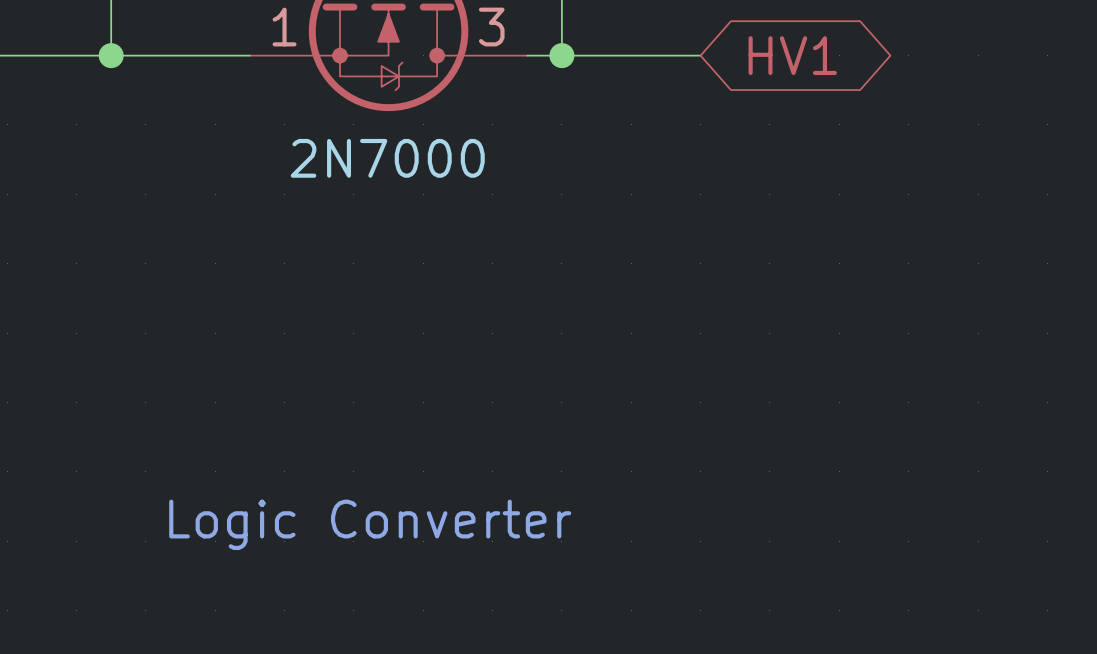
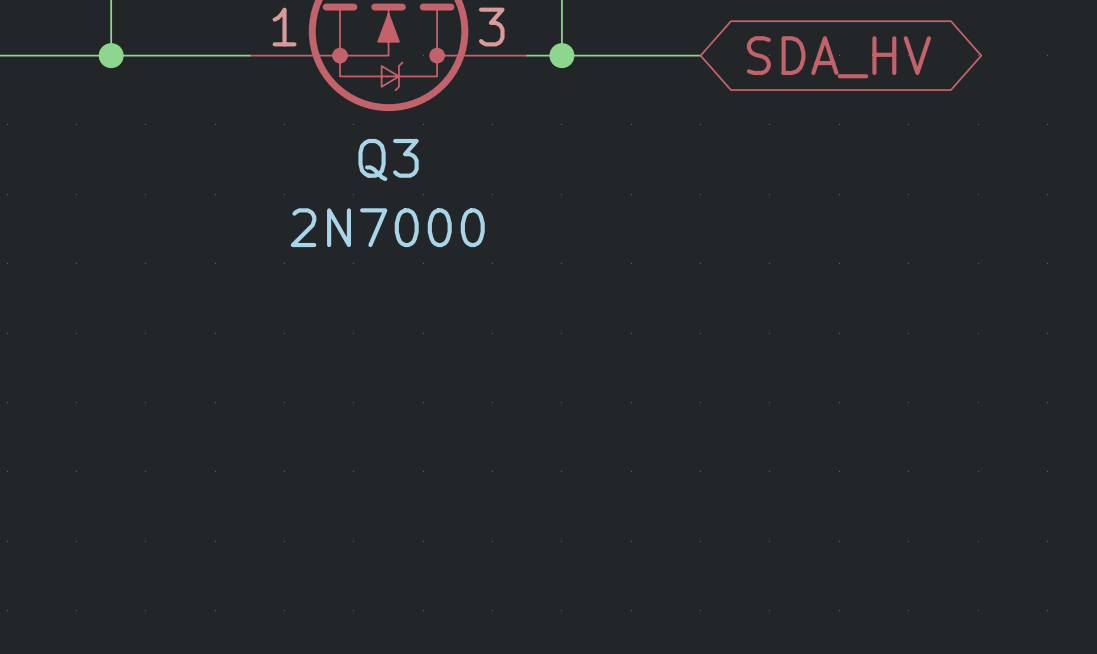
global label: HV1 (792, 55) -> SDA_HV (838, 57)
Q3 value position: 2N7000 (387, 158) -> 2N7000 (387, 227)
Q3 name: none -> Q3 (388, 159)
text: Logic Converter (370, 524) -> none

